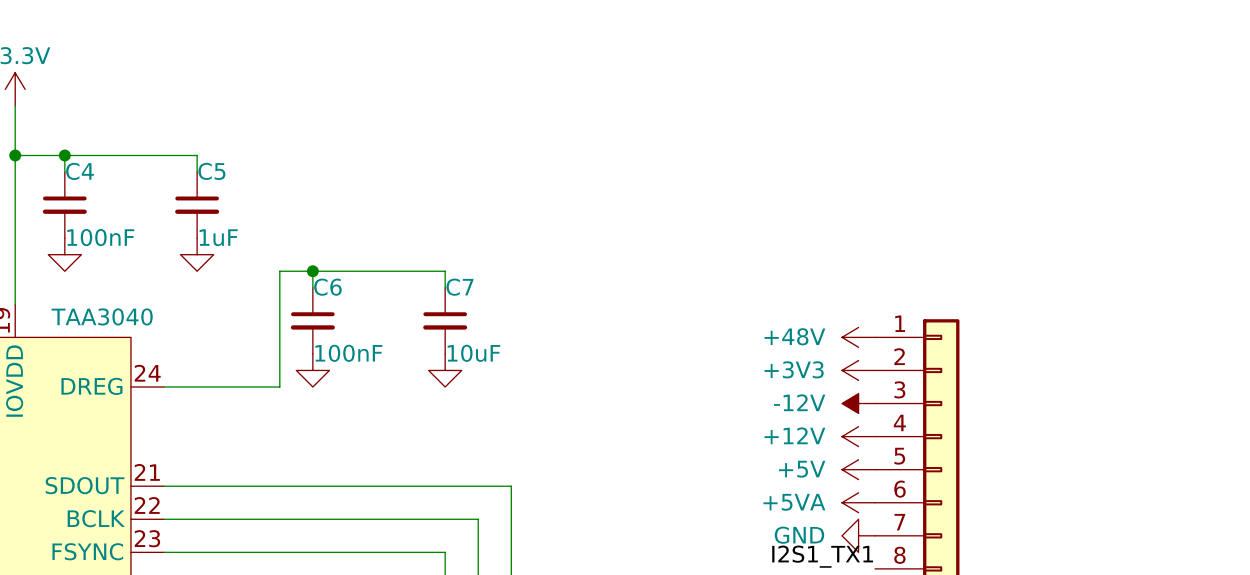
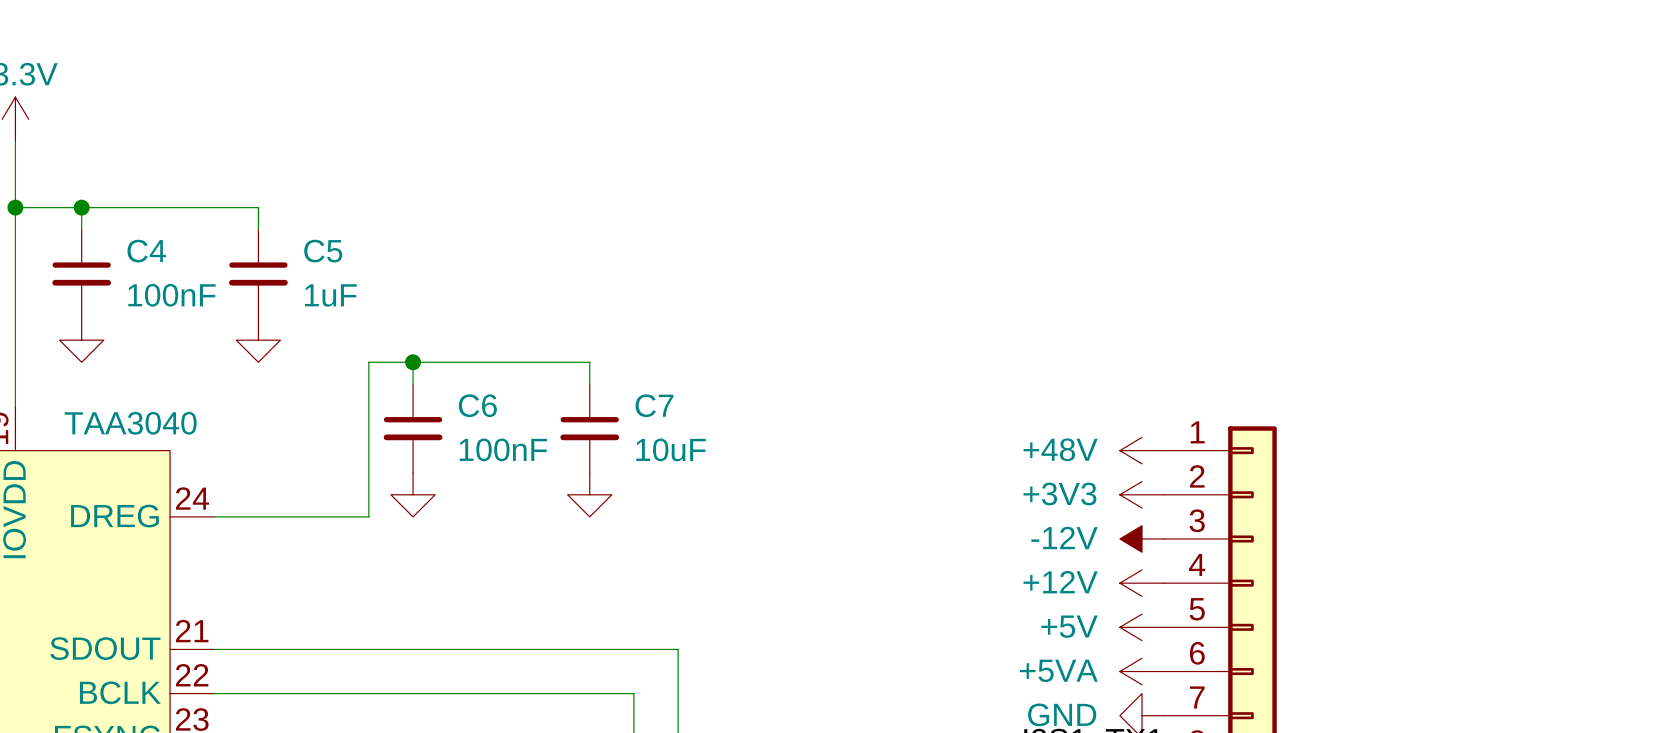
C4 name position: C4 (79, 171) -> C4 (146, 251)
C5 name position: C5 (211, 171) -> C5 (323, 251)
C4 value position: 100nF (100, 237) -> 100nF (171, 295)
C5 value position: 1uF (218, 237) -> 1uF (330, 295)
C6 name position: C6 (327, 287) -> C6 (477, 405)
C7 name position: C7 (459, 287) -> C7 (654, 405)
C6 value position: 100nF (348, 353) -> 100nF (503, 449)
C7 value position: 10uF (473, 353) -> 10uF (671, 449)

